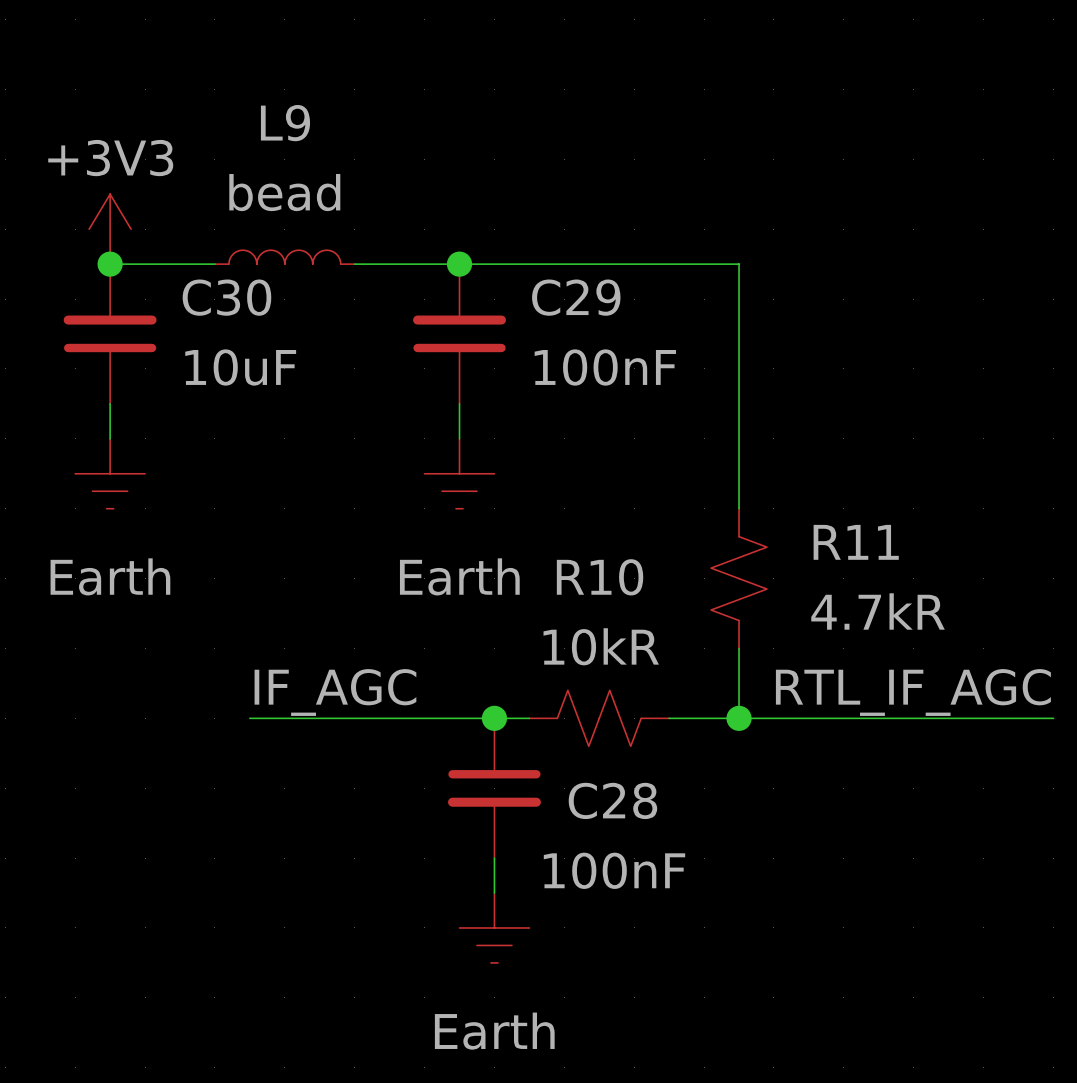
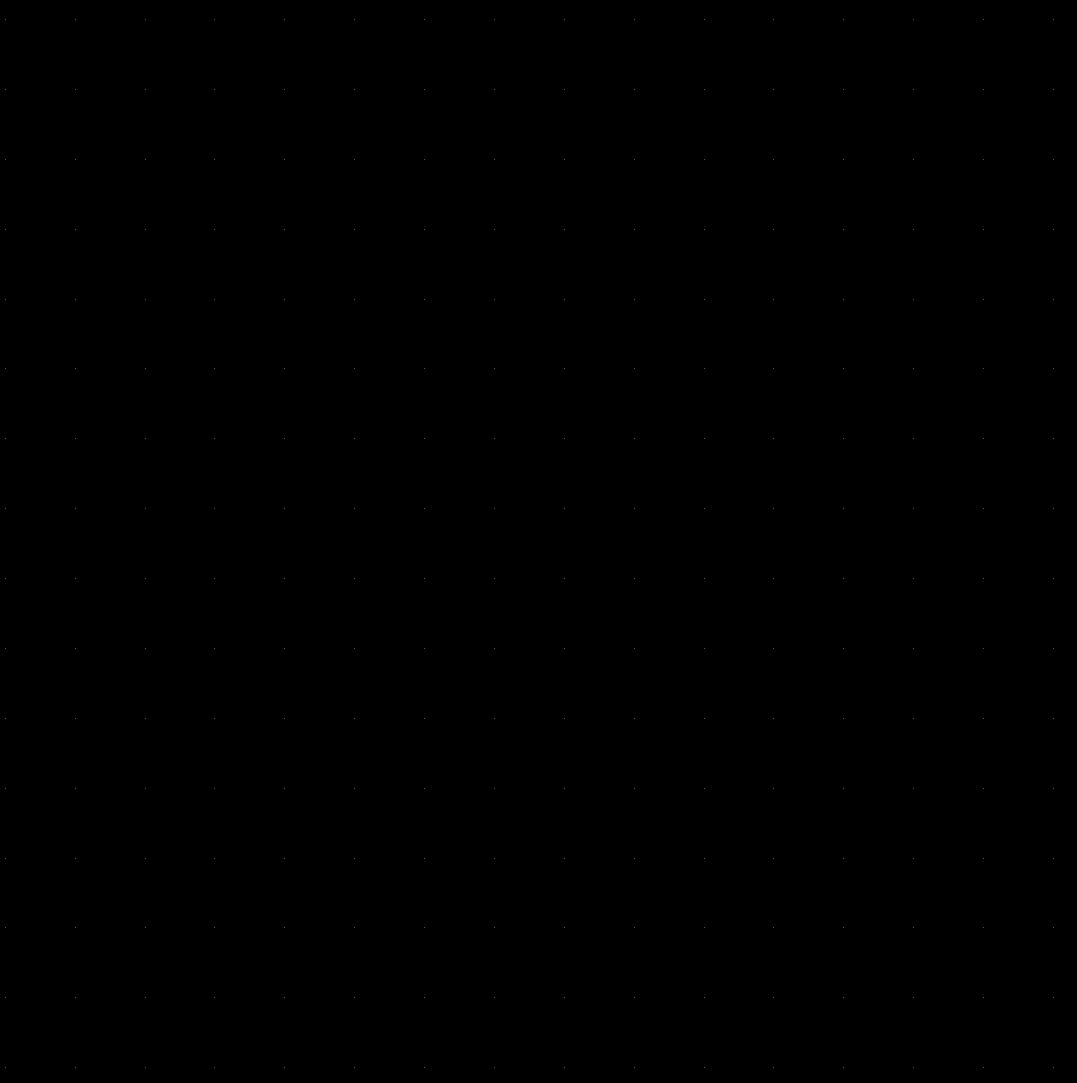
power symbol: +3V3 (110, 229) -> none
L9: bead (284, 257) -> none
wire: (110, 264) (214, 264) -> none
junction: (110, 264) -> none
wire: (354, 264) (739, 264) (739, 508) -> none
junction: (459, 264) -> none
C30: 10uF (110, 334) -> none
C29: 100nF (459, 334) -> none
wire: (110, 403) (110, 438) -> none
wire: (459, 403) (459, 438) -> none
power symbol: Earth (110, 473) -> none
power symbol: Earth (459, 473) -> none
R11: 4.7kR (739, 578) -> none
wire: (739, 648) (739, 718) -> none
label: IF_AGC (335, 692) -> none
label: RTL_IF_AGC (913, 692) -> none
wire: (249, 718) (529, 718) -> none
junction: (494, 718) -> none
R10: 10kR (599, 718) -> none
wire: (669, 718) (1053, 718) -> none
junction: (739, 718) -> none
C28: 100nF (494, 788) -> none
wire: (494, 858) (494, 893) -> none
power symbol: Earth (494, 927) -> none

